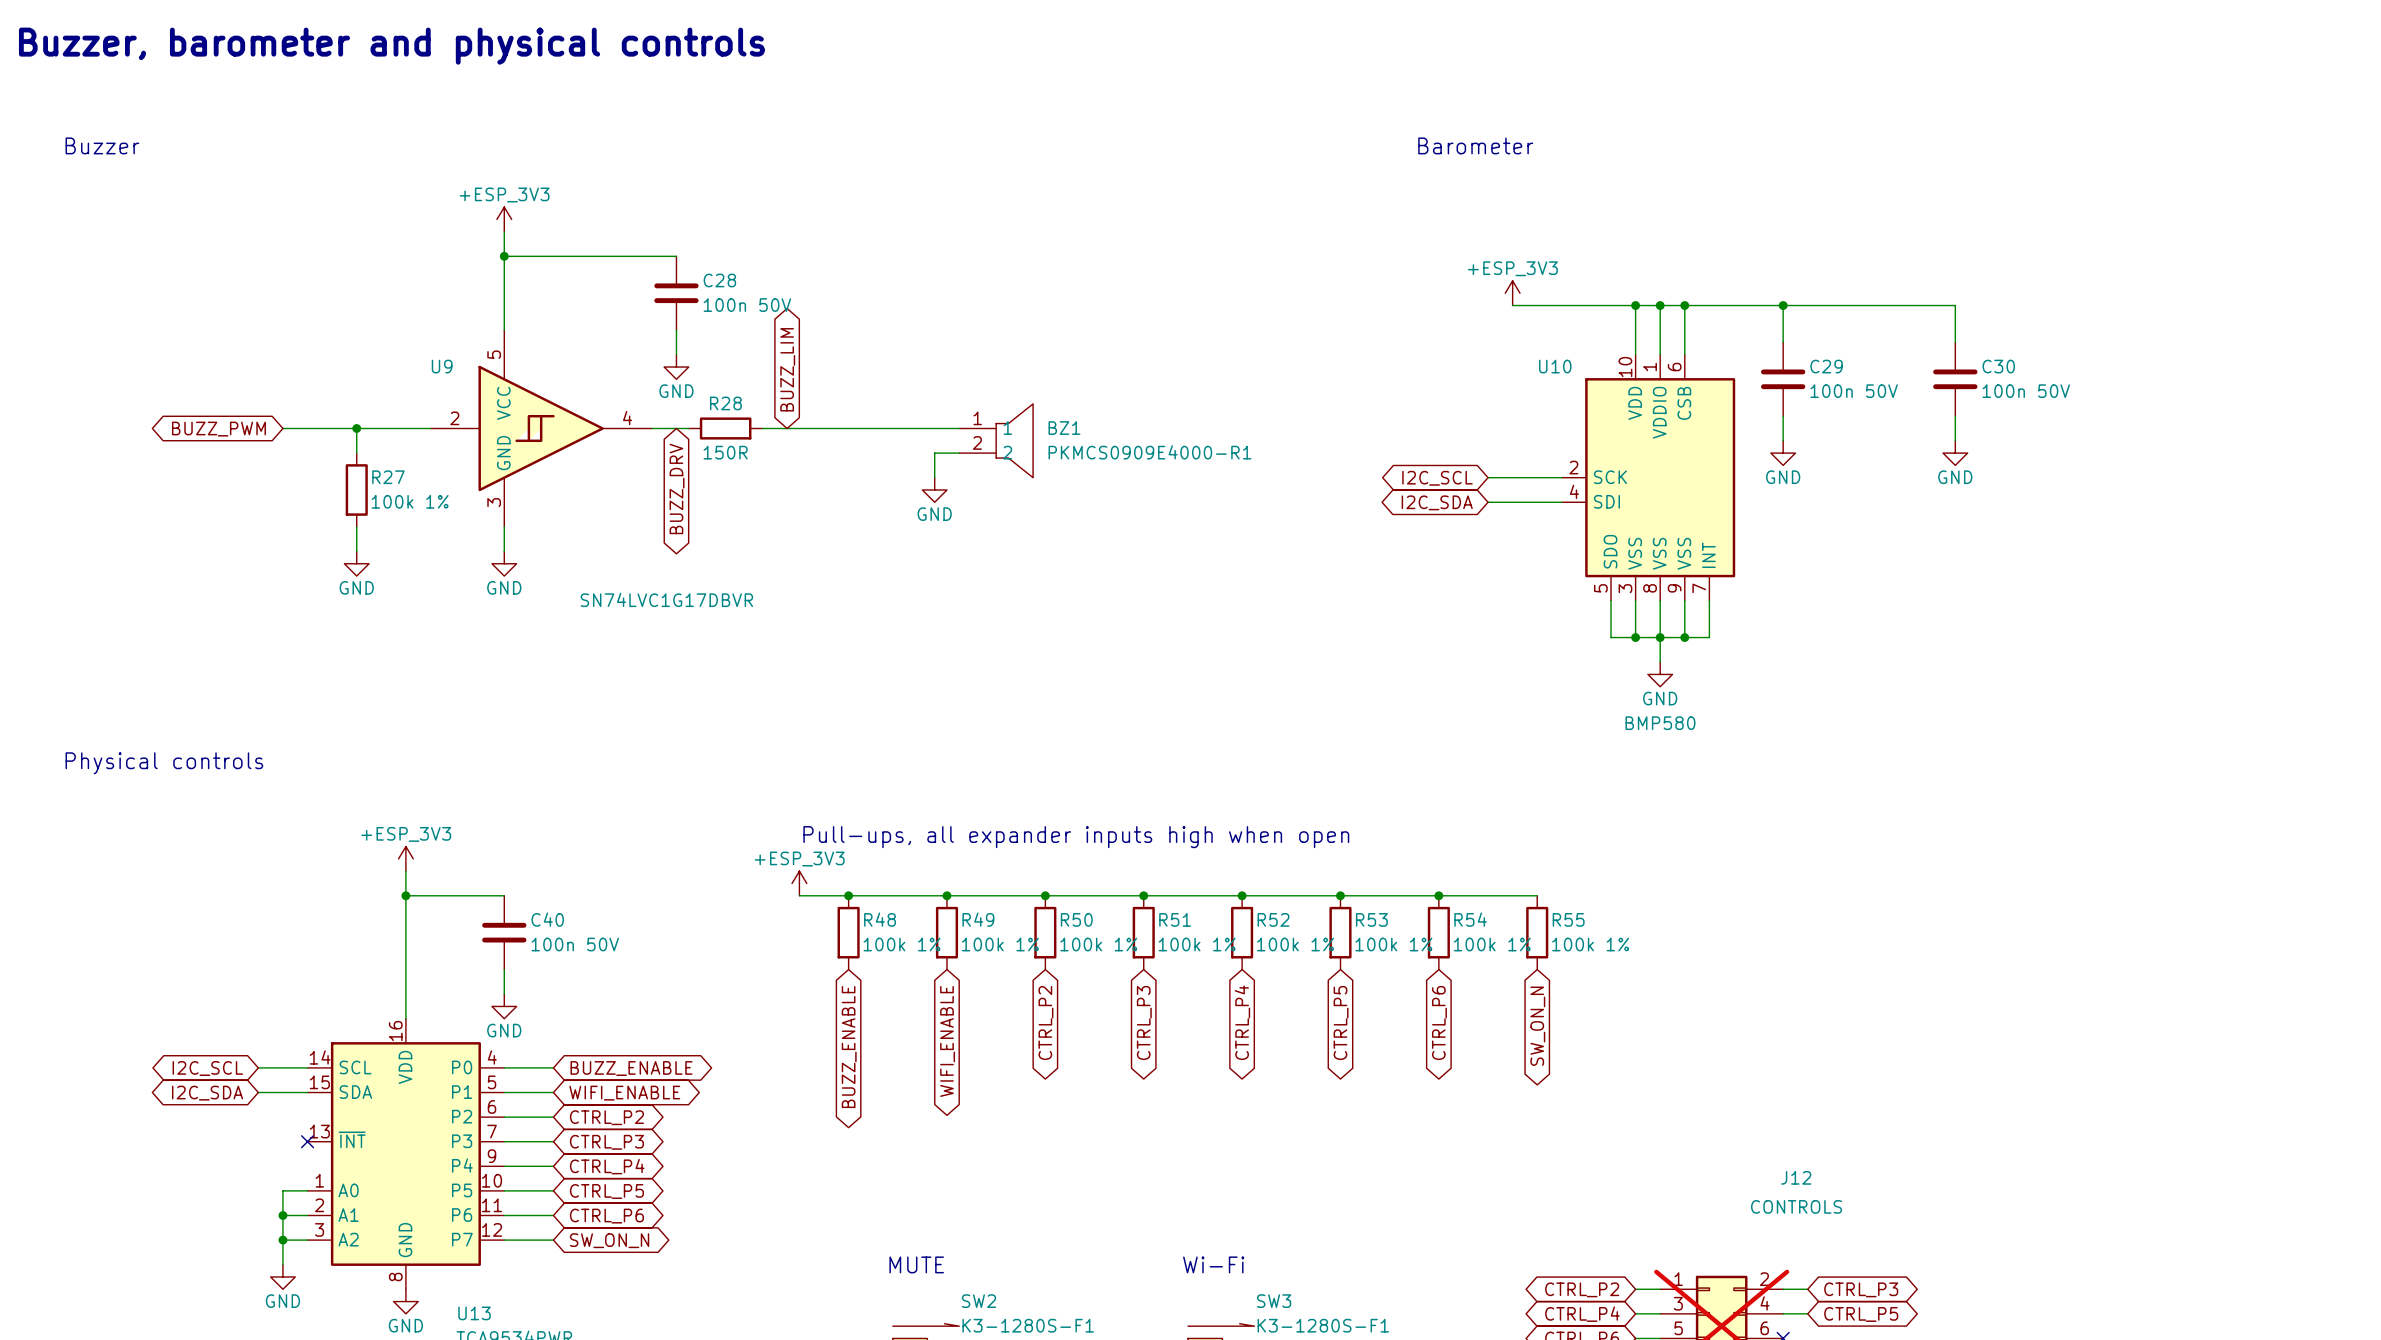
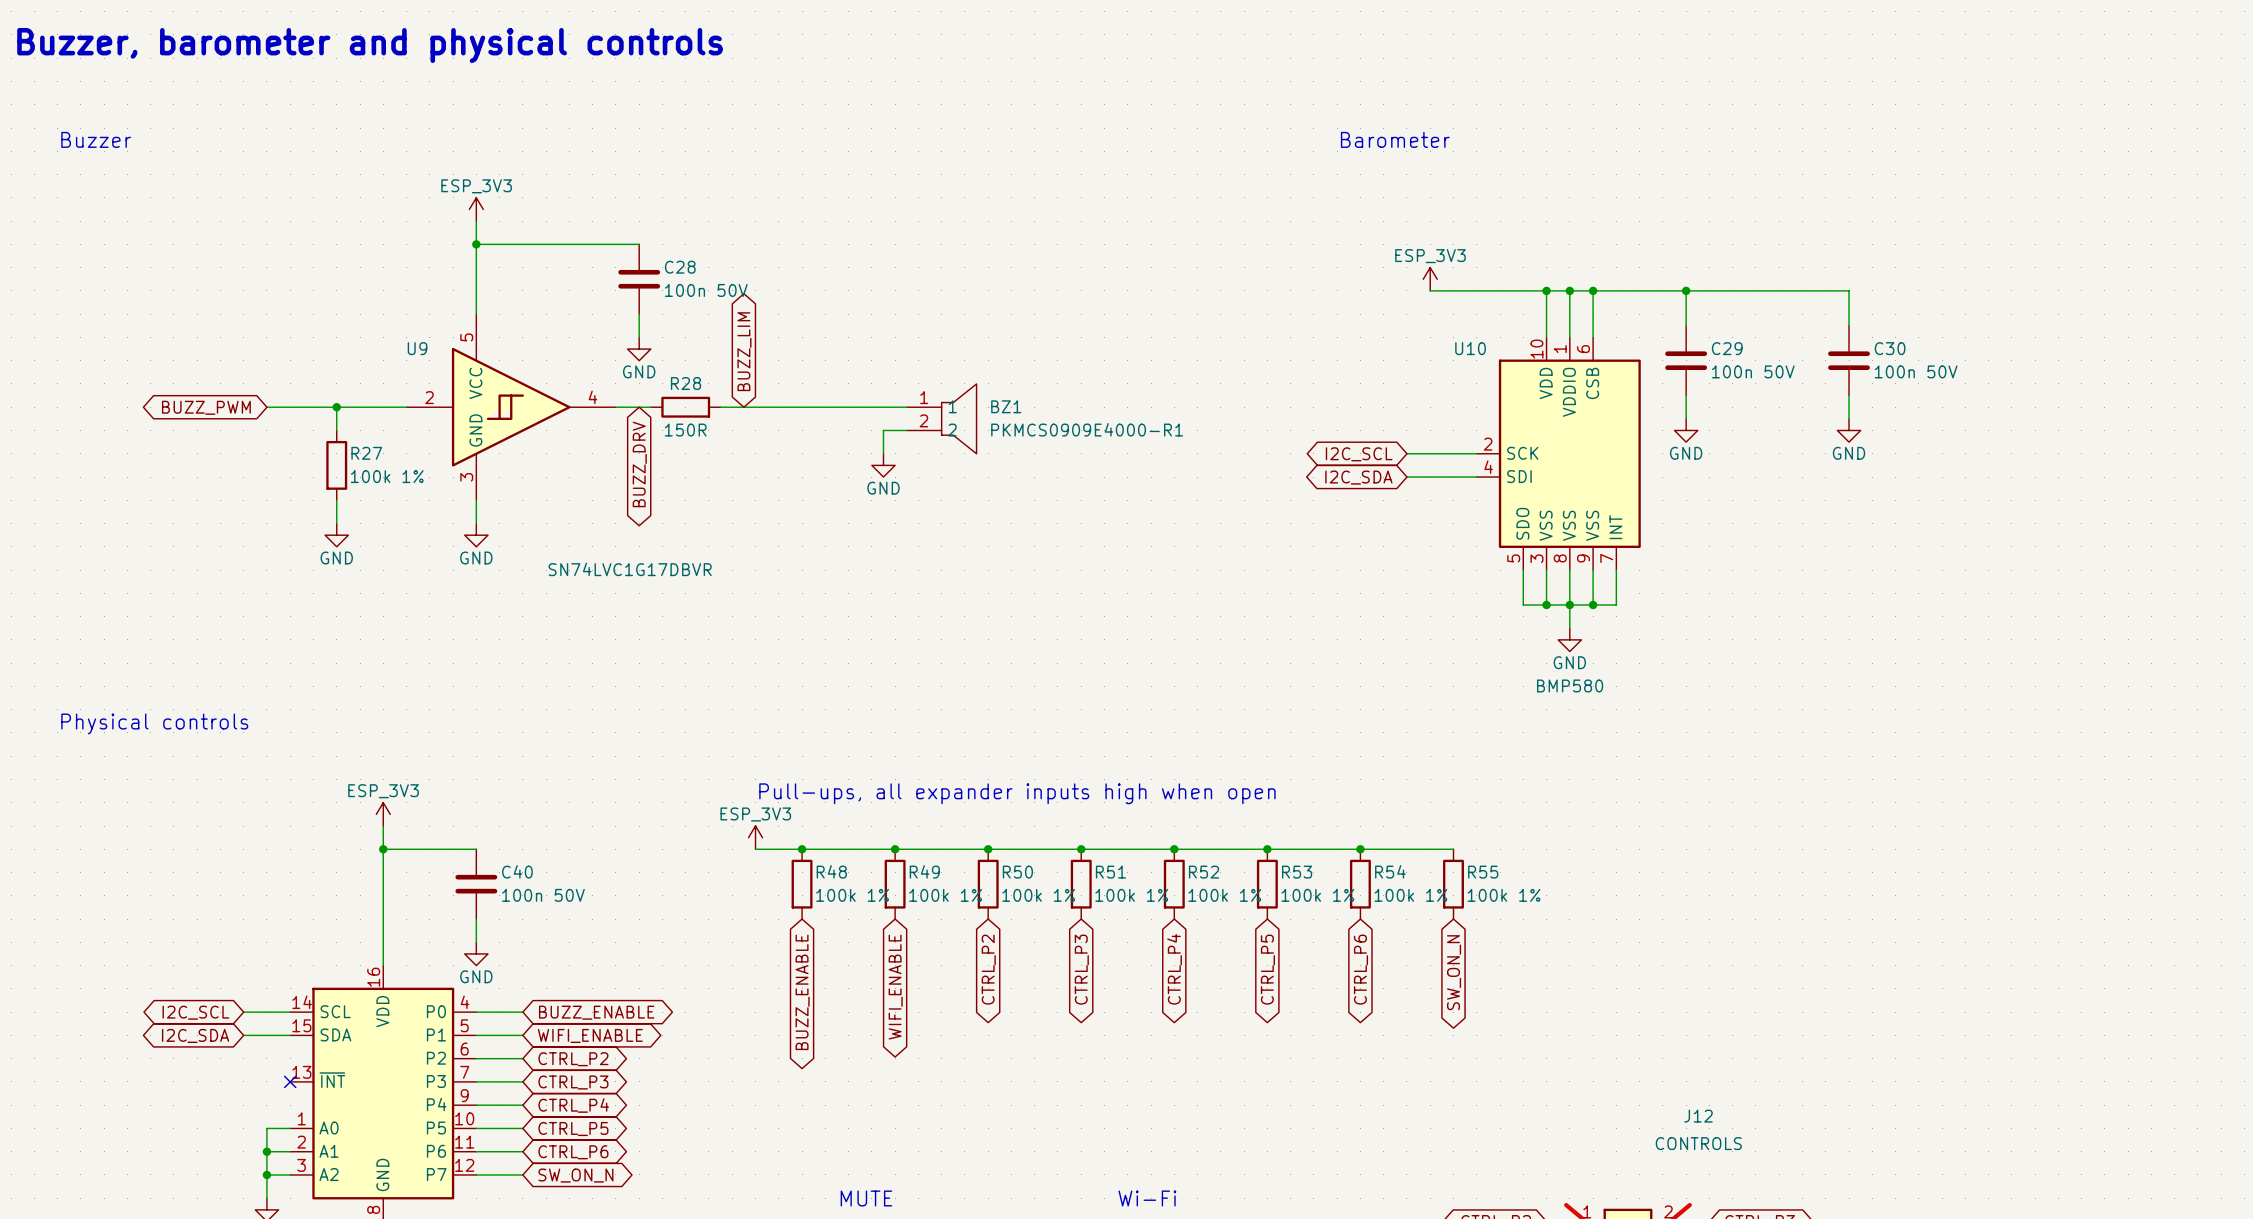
power symbol: +ESP_3V3 (504, 219) -> ESP_3V3 (476, 209)
power symbol: +ESP_3V3 (1512, 293) -> ESP_3V3 (1430, 279)
power symbol: +ESP_3V3 (405, 858) -> ESP_3V3 (383, 814)
power symbol: +ESP_3V3 (799, 883) -> ESP_3V3 (755, 837)

